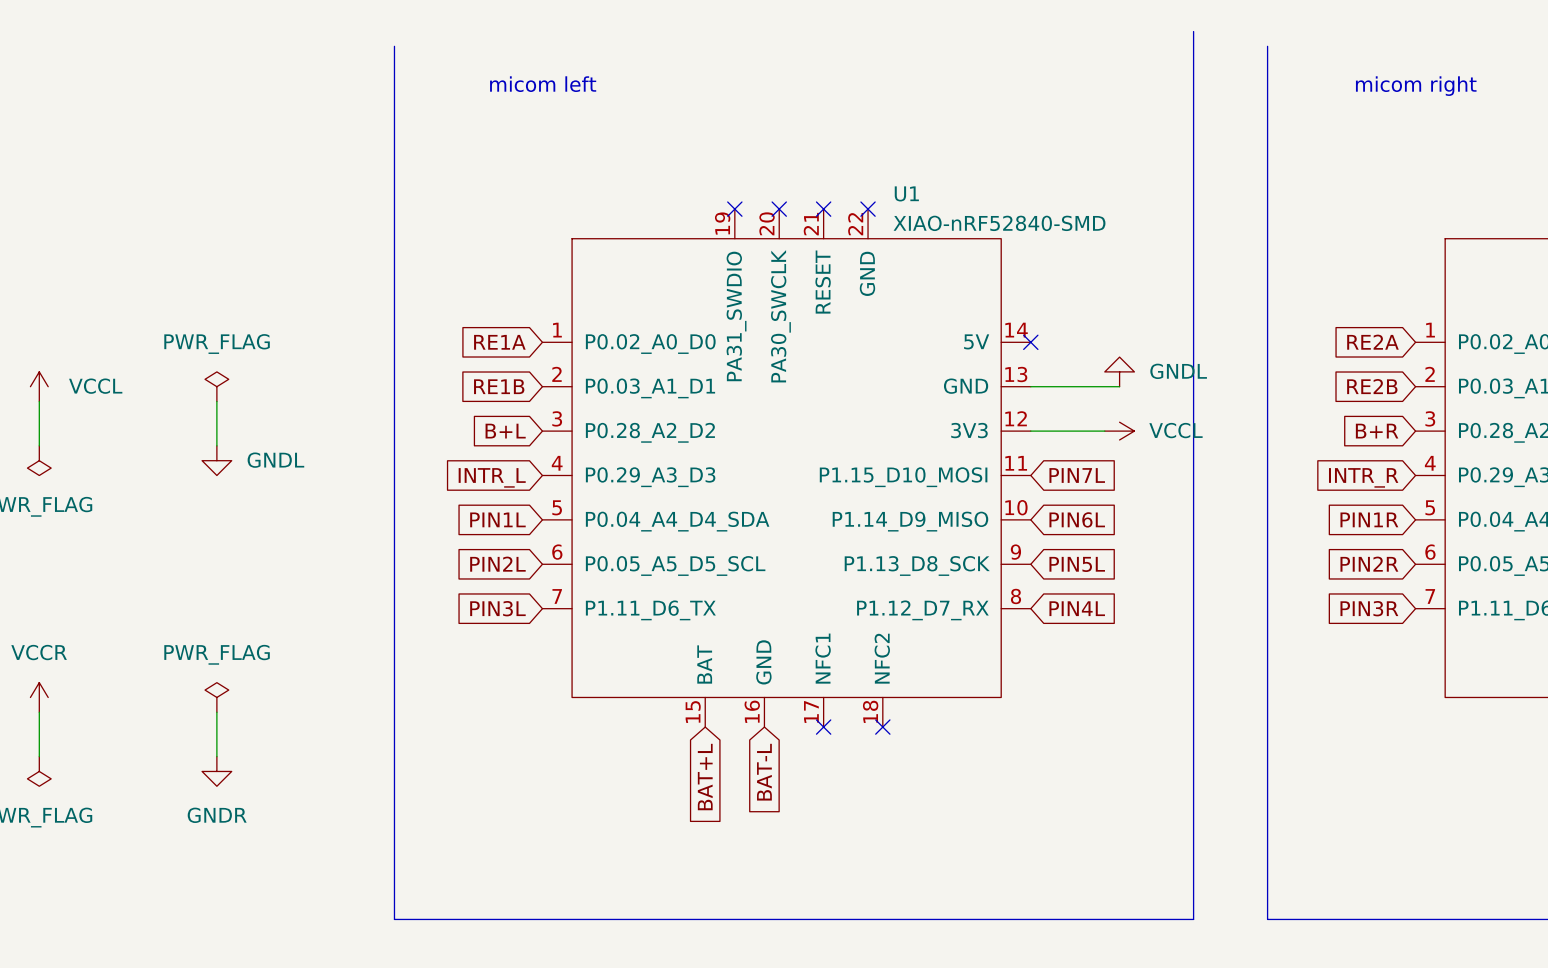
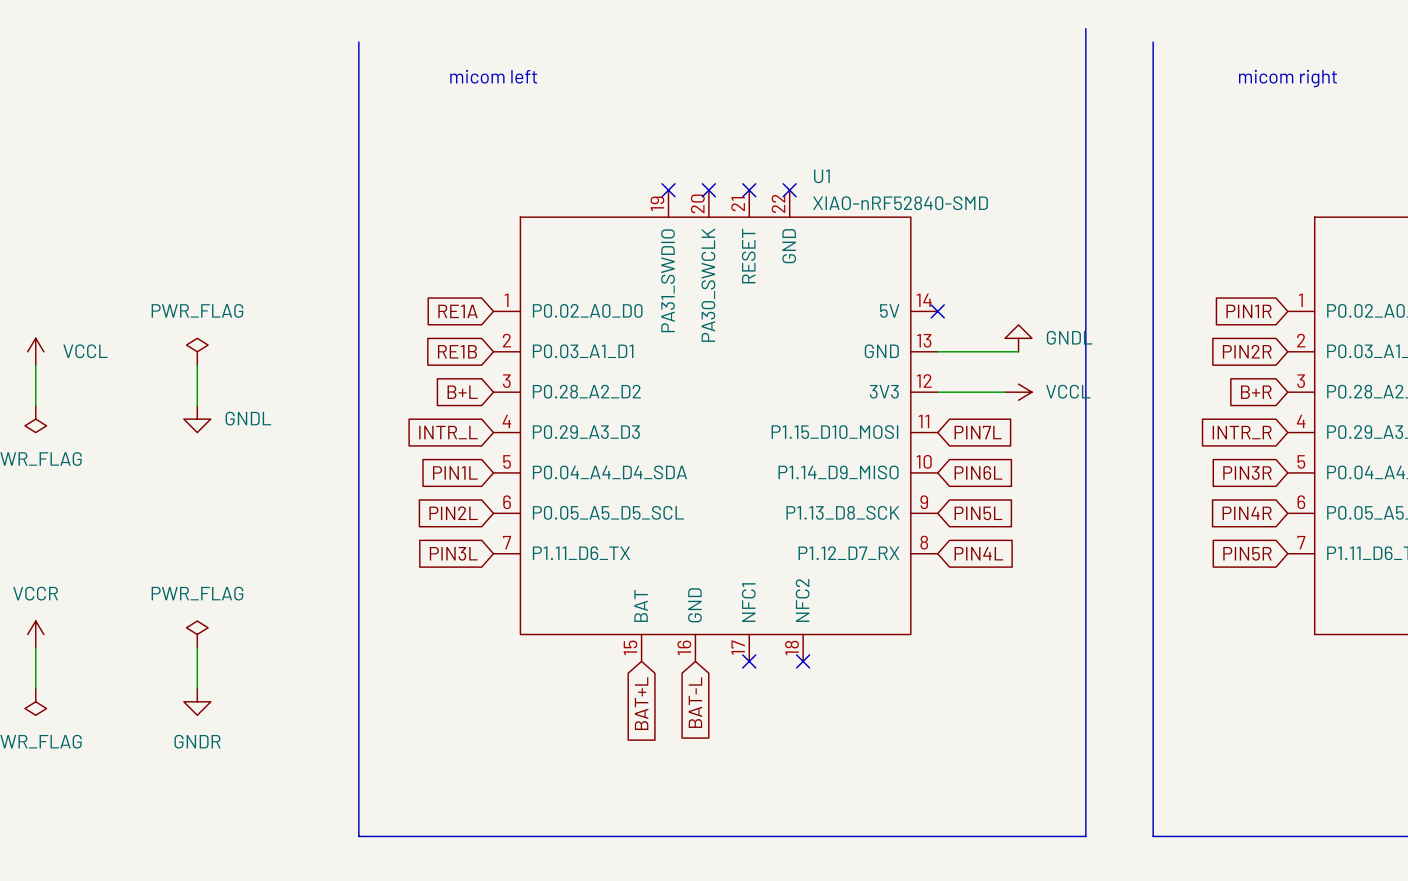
global label: RE2A (1372, 342) -> PIN1R (1249, 311)
global label: RE2B (1372, 386) -> PIN2R (1247, 351)
global label: PIN1R (1369, 519) -> PIN3R (1247, 473)
global label: PIN2R (1369, 564) -> PIN4R (1247, 513)
global label: PIN3R (1369, 608) -> PIN5R (1247, 553)

